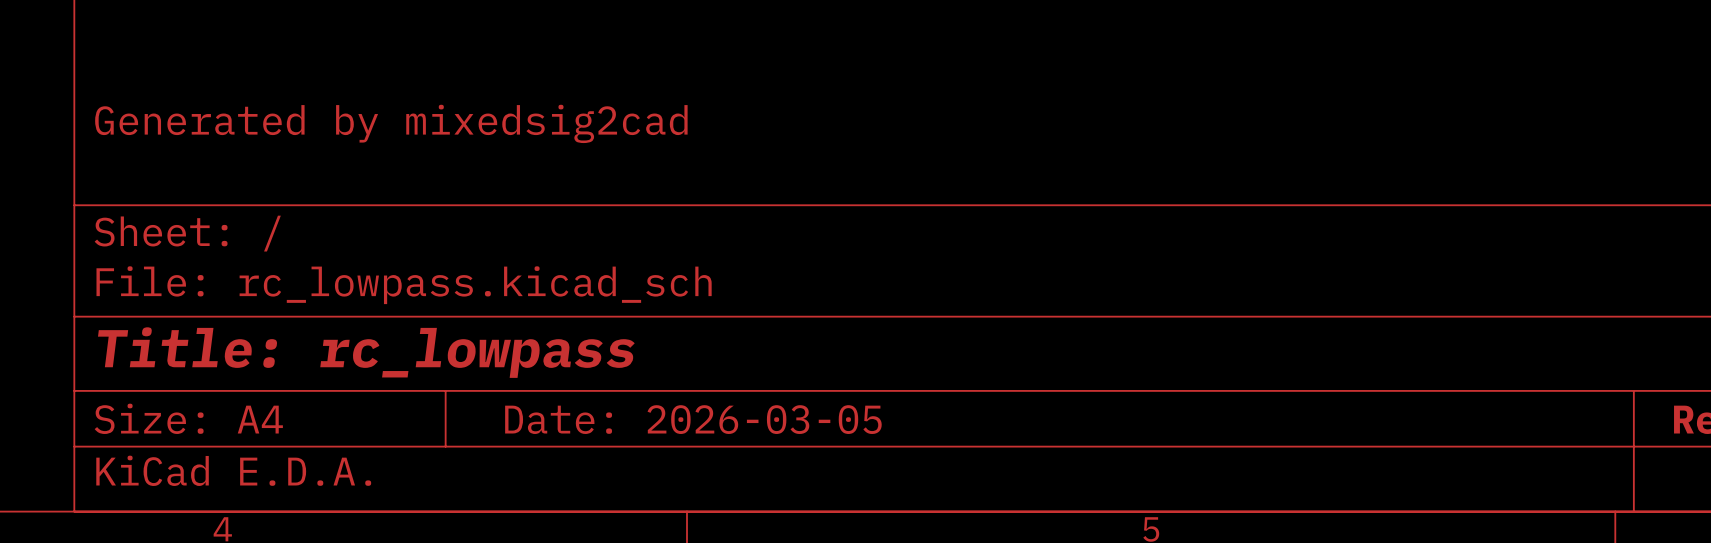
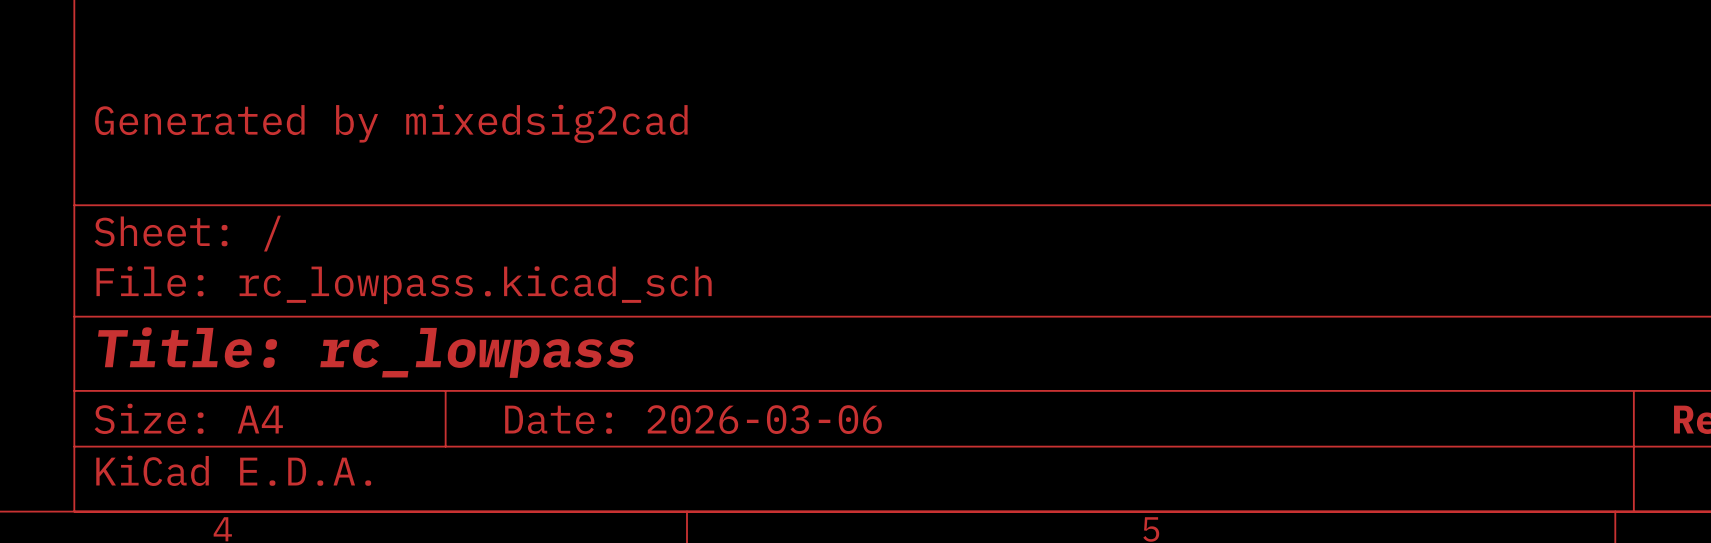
title block: Date: 2026-03-05 (693, 419) -> Date: 2026-03-06 (693, 419)

